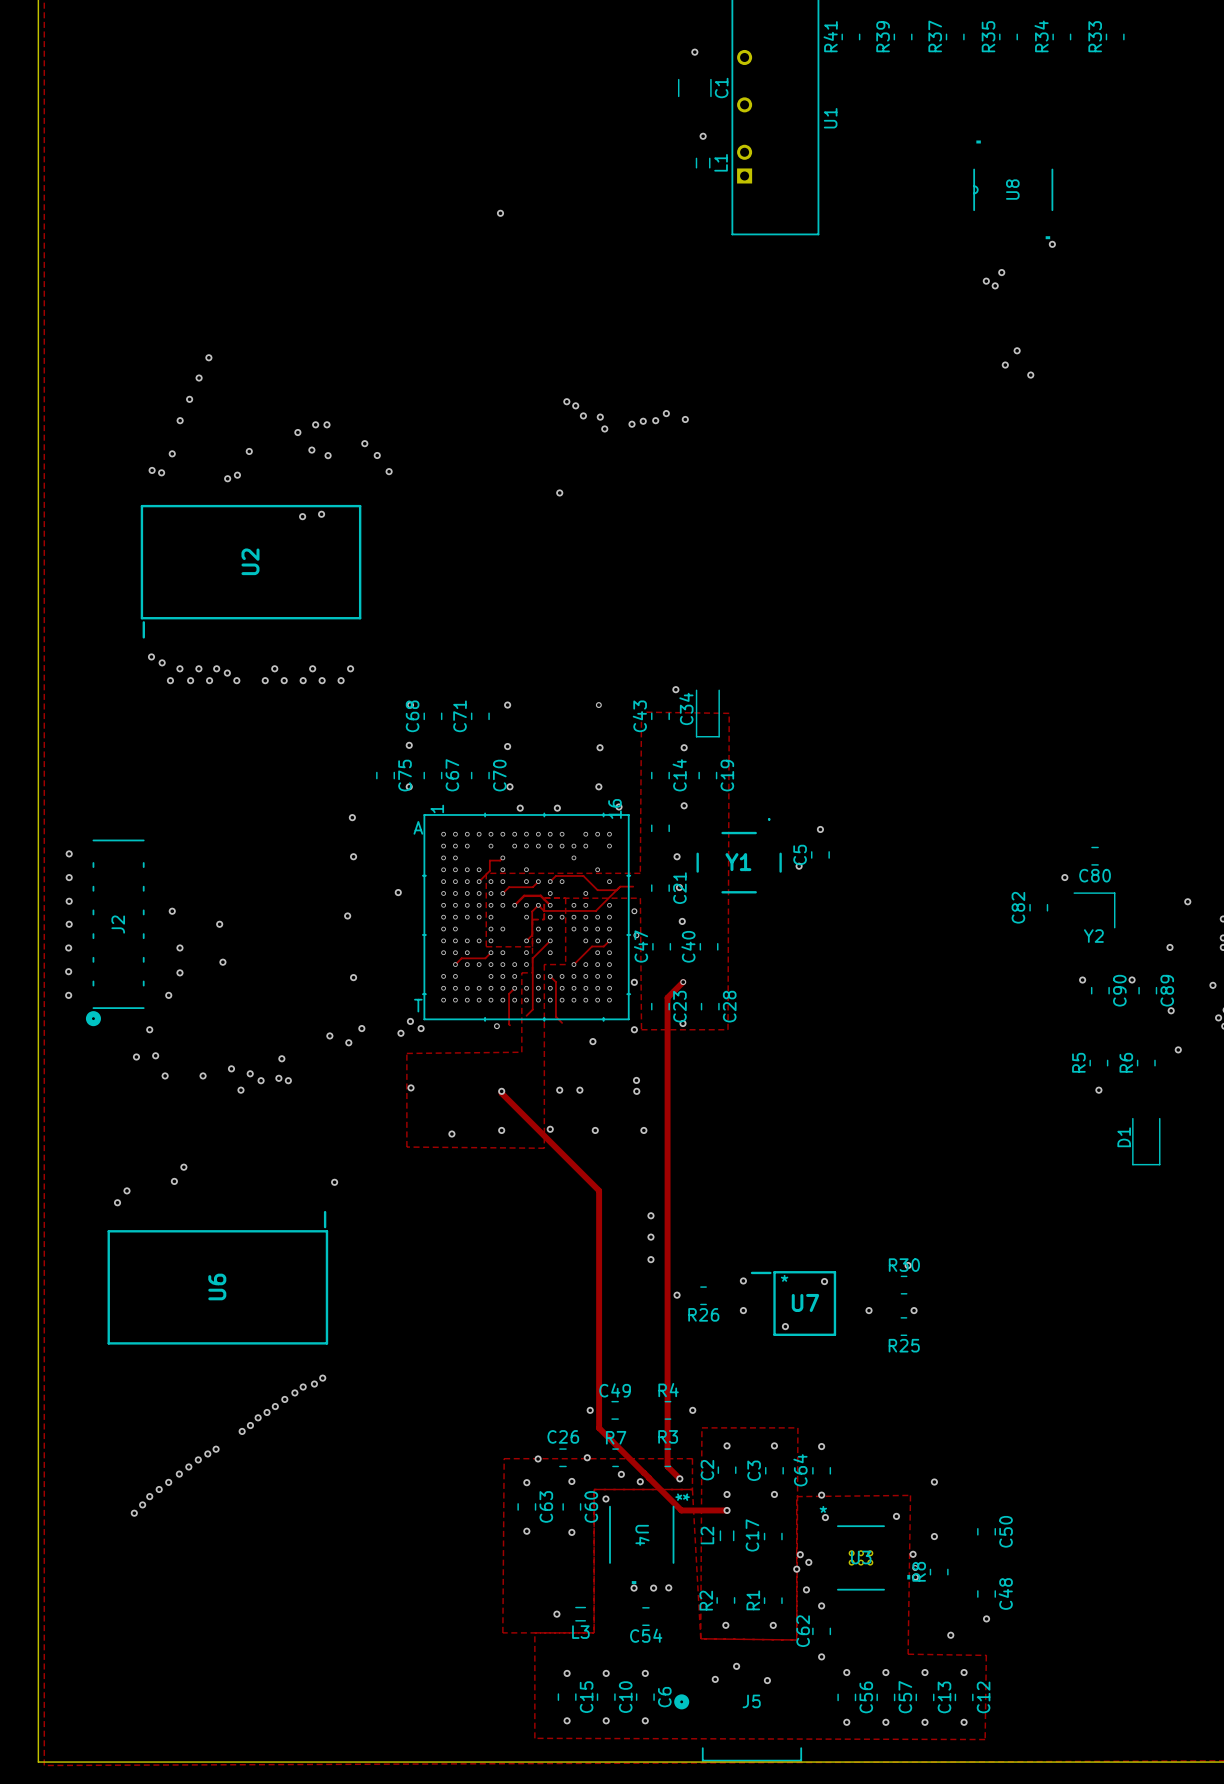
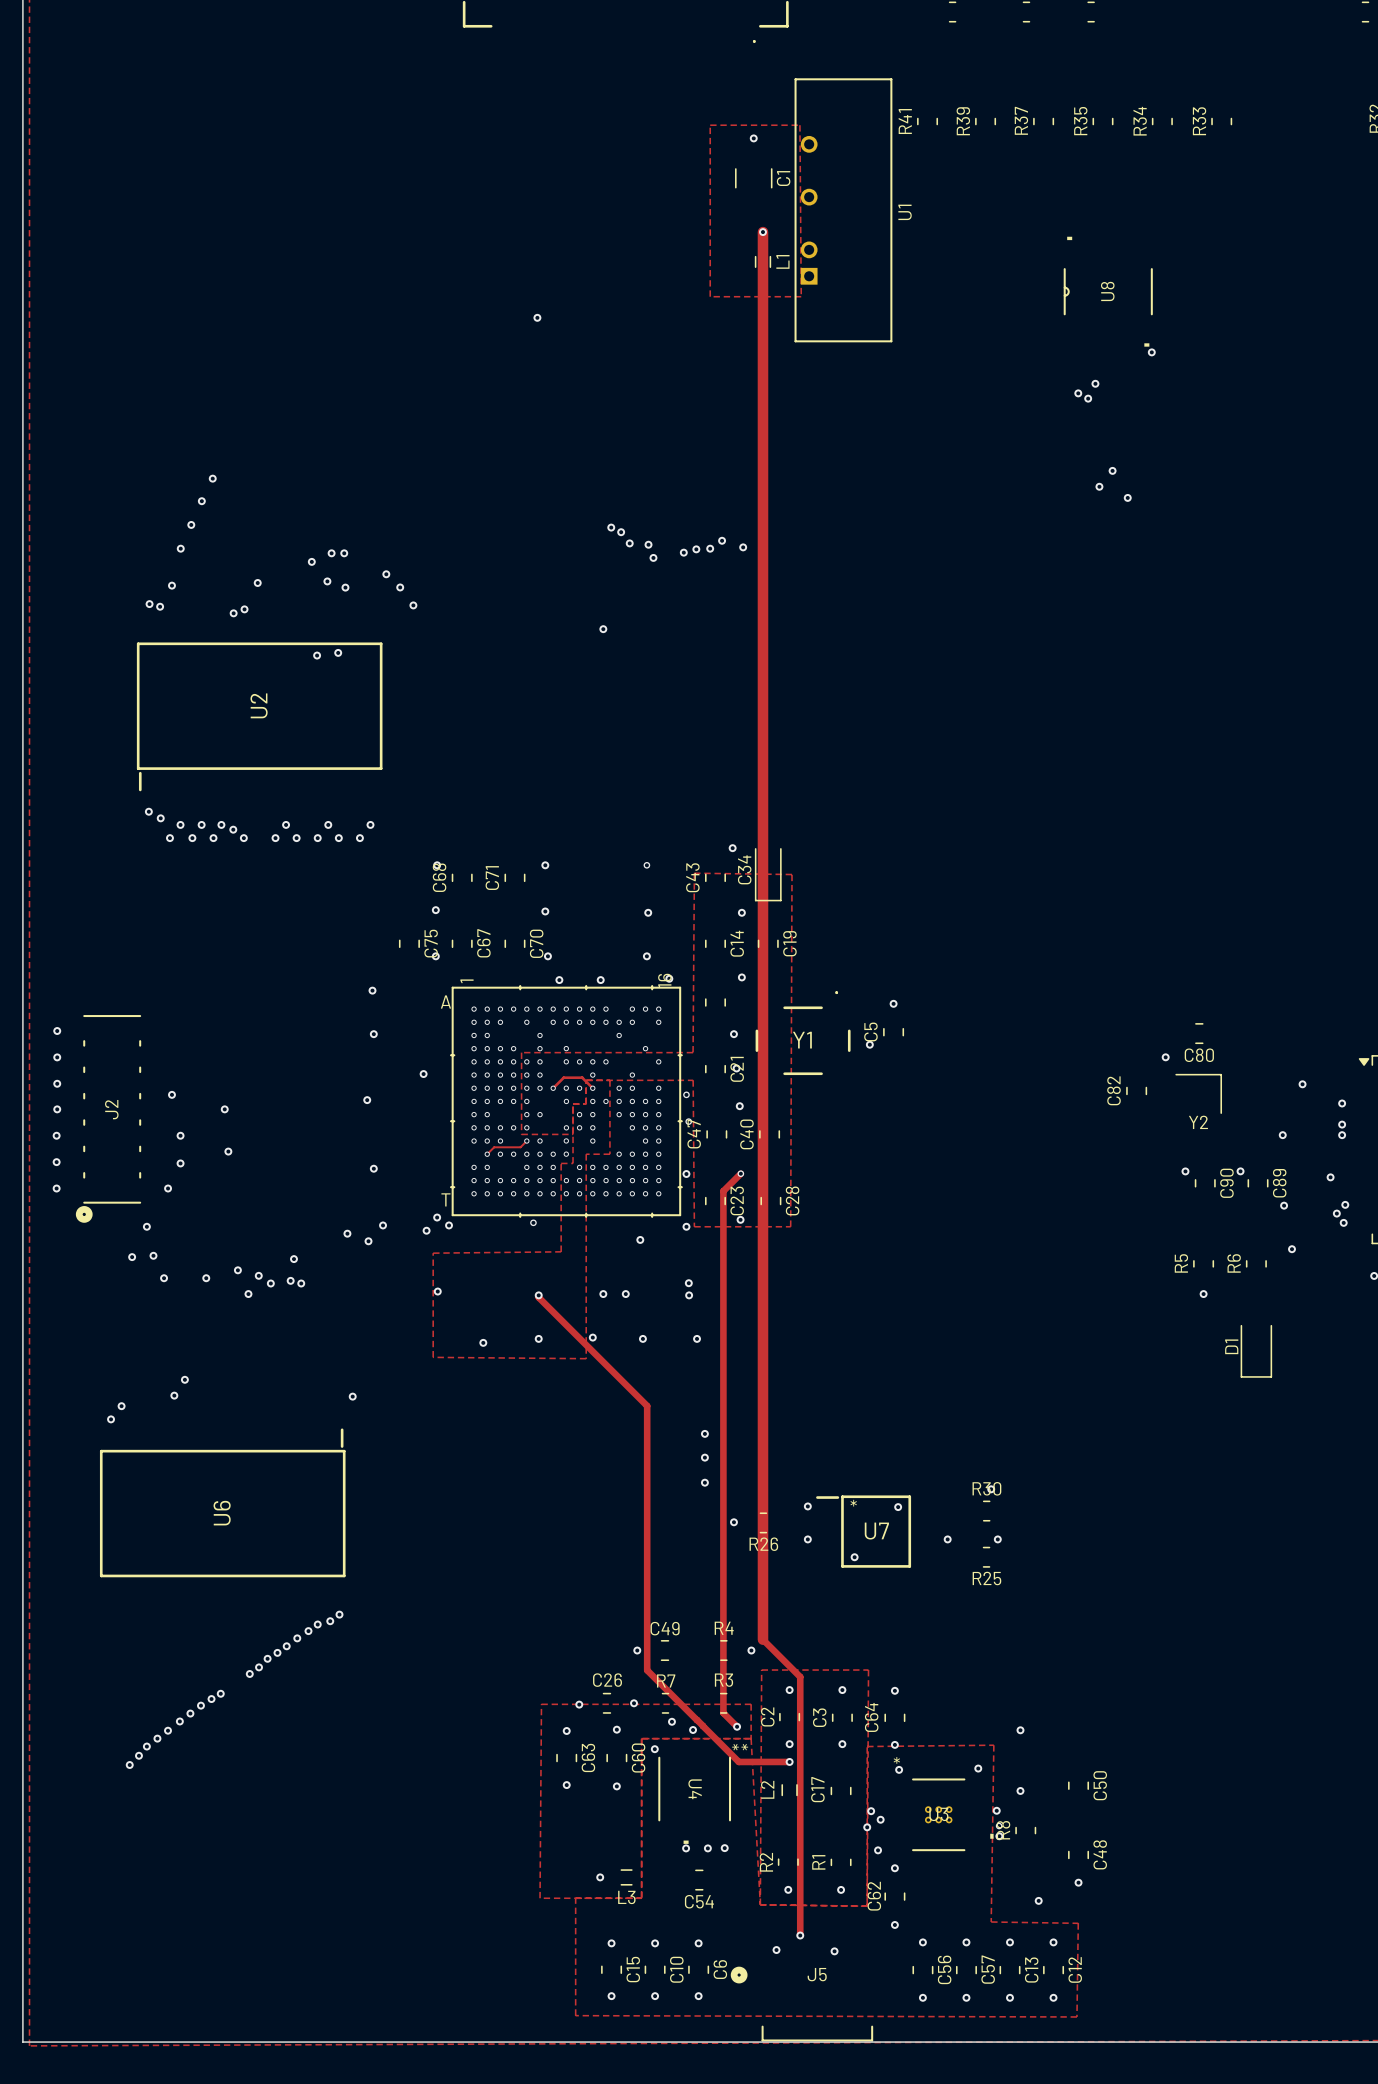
zone outline: none -> (710, 125) (799, 125) (801, 296) (710, 296) (710, 125)
track: none -> (762, 232) (762, 1639) (800, 1676) (800, 1935)
track: (502, 857) (500, 860) (489, 860) (489, 870) (479, 881) -> none
track: (538, 881) (532, 887) (509, 887) (502, 893) -> none
track: (550, 881) (555, 875) (583, 875) (597, 890) (616, 890) -> none
track: (633, 886) (620, 886) (595, 910) (544, 910) (538, 905) (532, 911) (532, 935) (526, 940) -> none
track: (550, 940) (532, 958) (532, 1009) (526, 1015) -> none
track: (609, 940) (603, 946) (592, 946) (573, 964) -> none
track: (550, 976) (555, 982) (555, 1016) (562, 1022) -> none
track: (514, 988) (509, 993) (509, 1025) -> none

